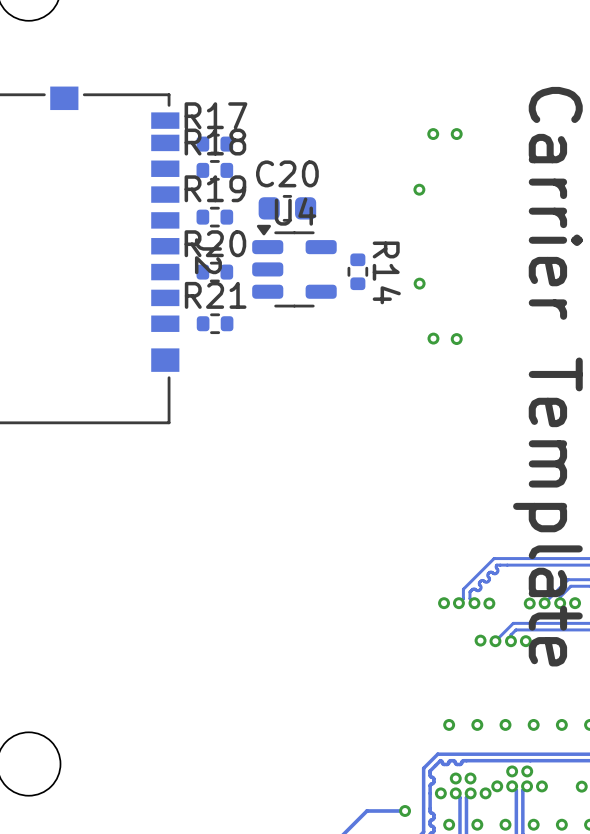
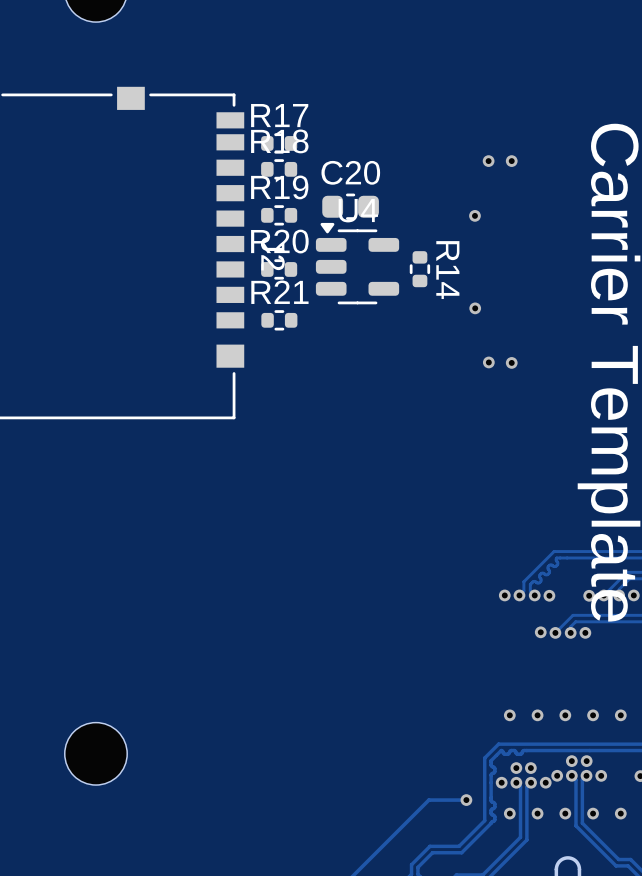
via: (433, 134) -> none
via: (456, 134) -> none
via: none -> (488, 161)
via: none -> (511, 161)
via: (419, 189) -> none
via: none -> (474, 215)
via: (419, 283) -> none
via: none -> (475, 308)
via: (433, 338) -> none
via: (456, 339) -> none
via: none -> (488, 362)
via: none -> (511, 362)

